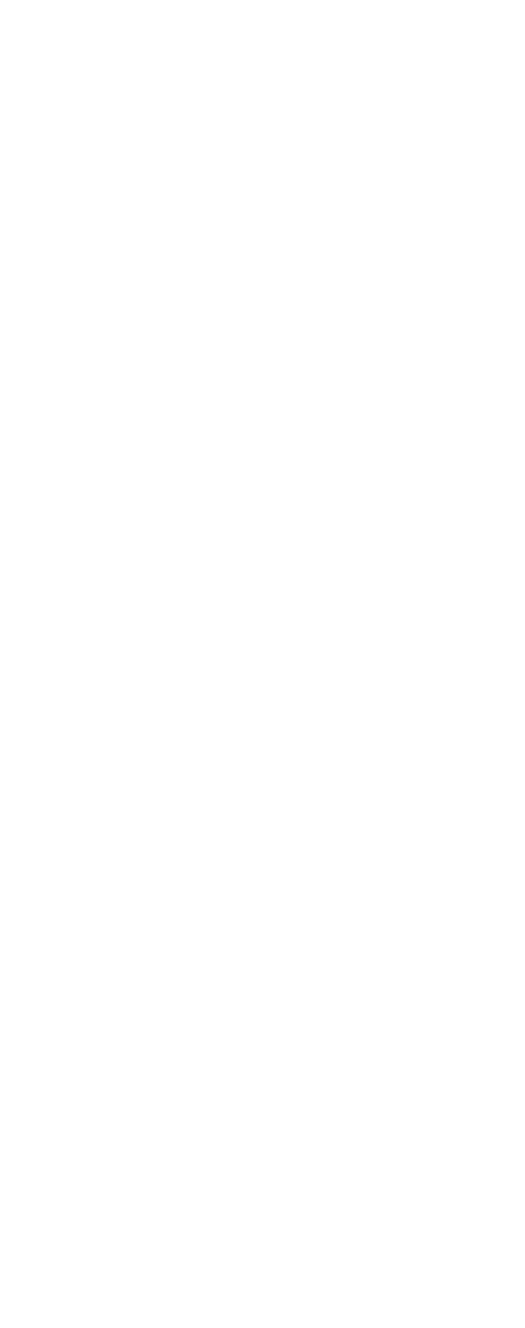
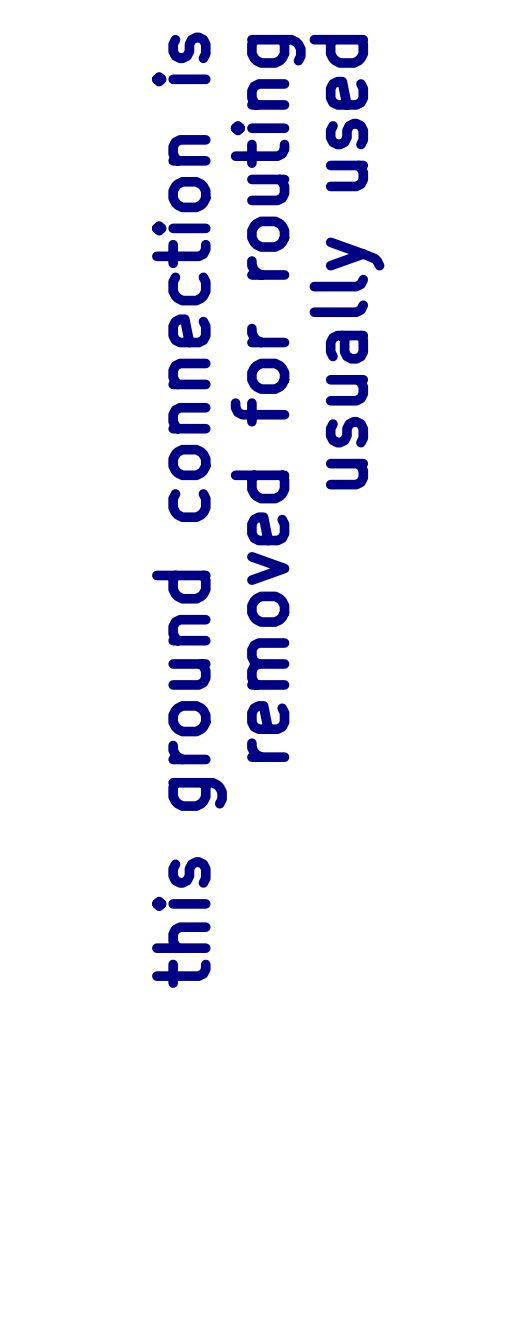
text: none -> usually used (346, 262)
text: none -> removed for routing (268, 398)
text: none -> this ground connection is (189, 510)

